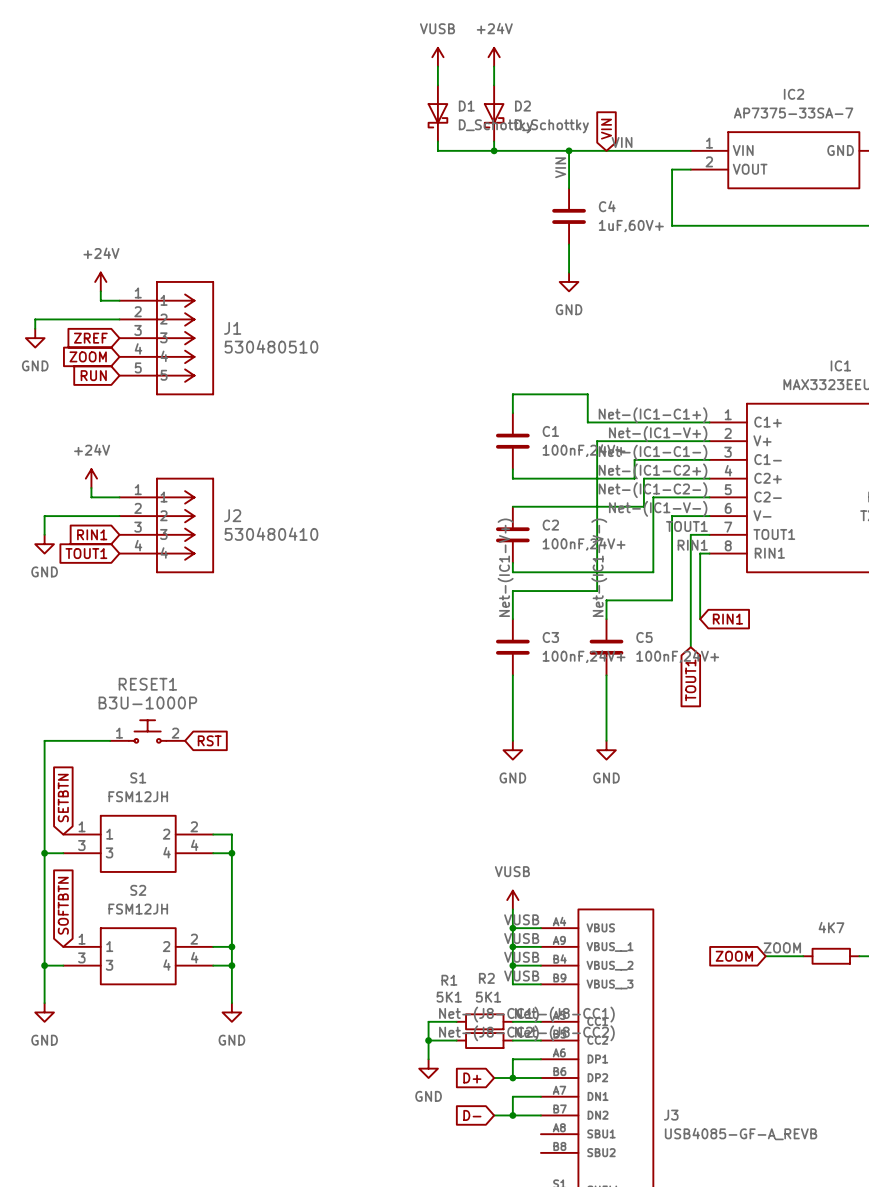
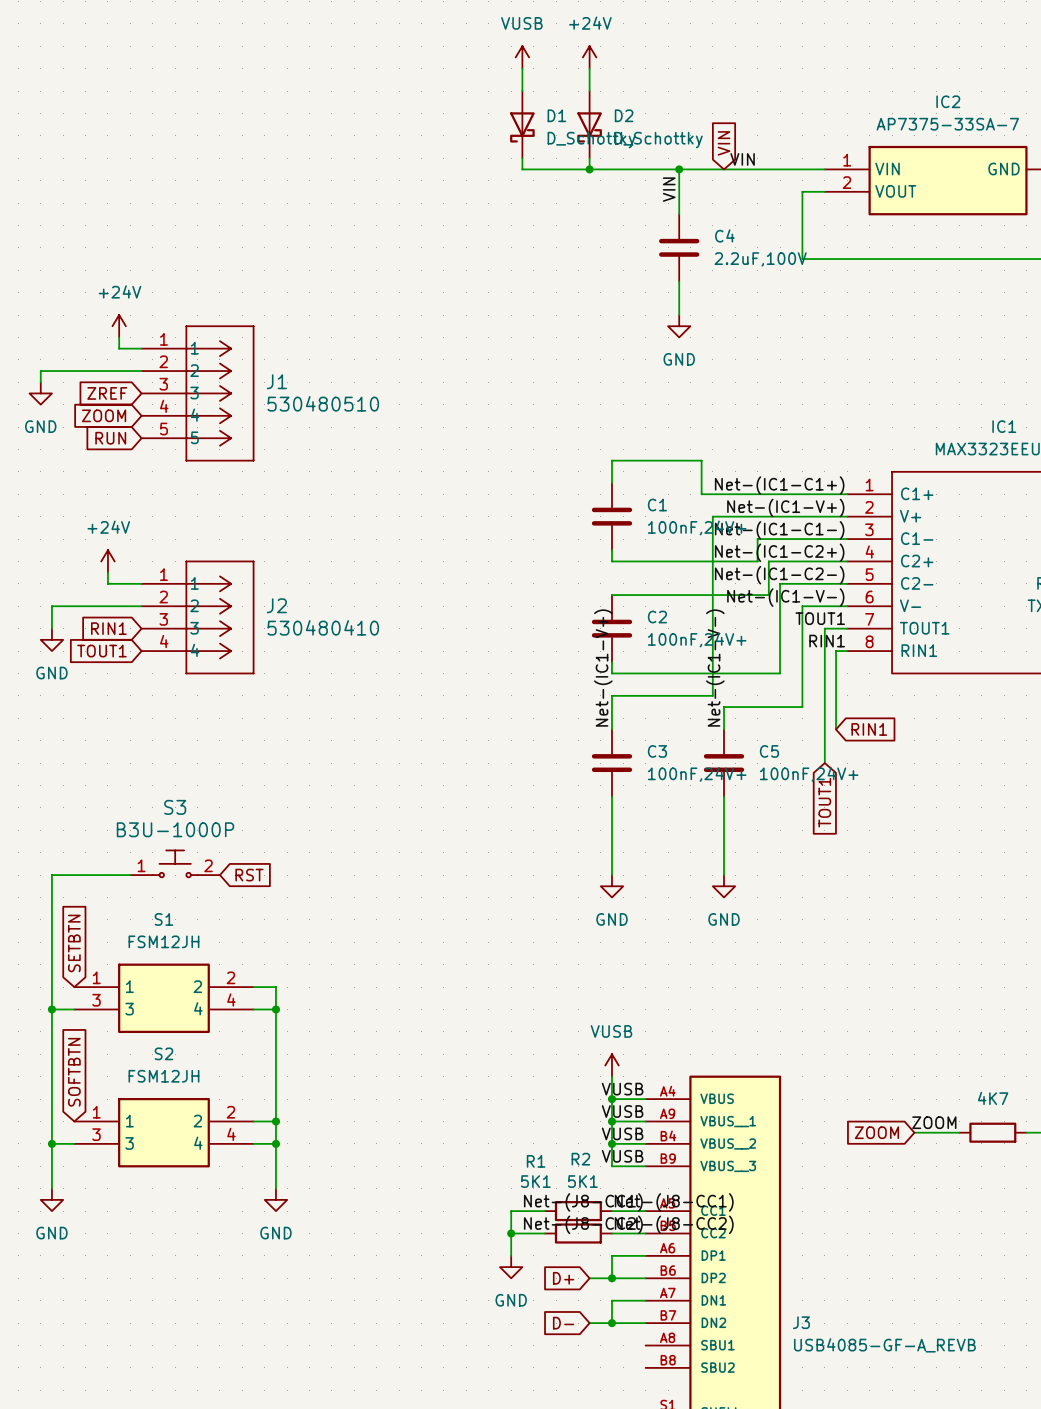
C4 value: 1uF,60V+ (631, 226) -> 2.2uF,100V (760, 259)
RESET1 name: RESET1 (147, 684) -> S3 (175, 807)

